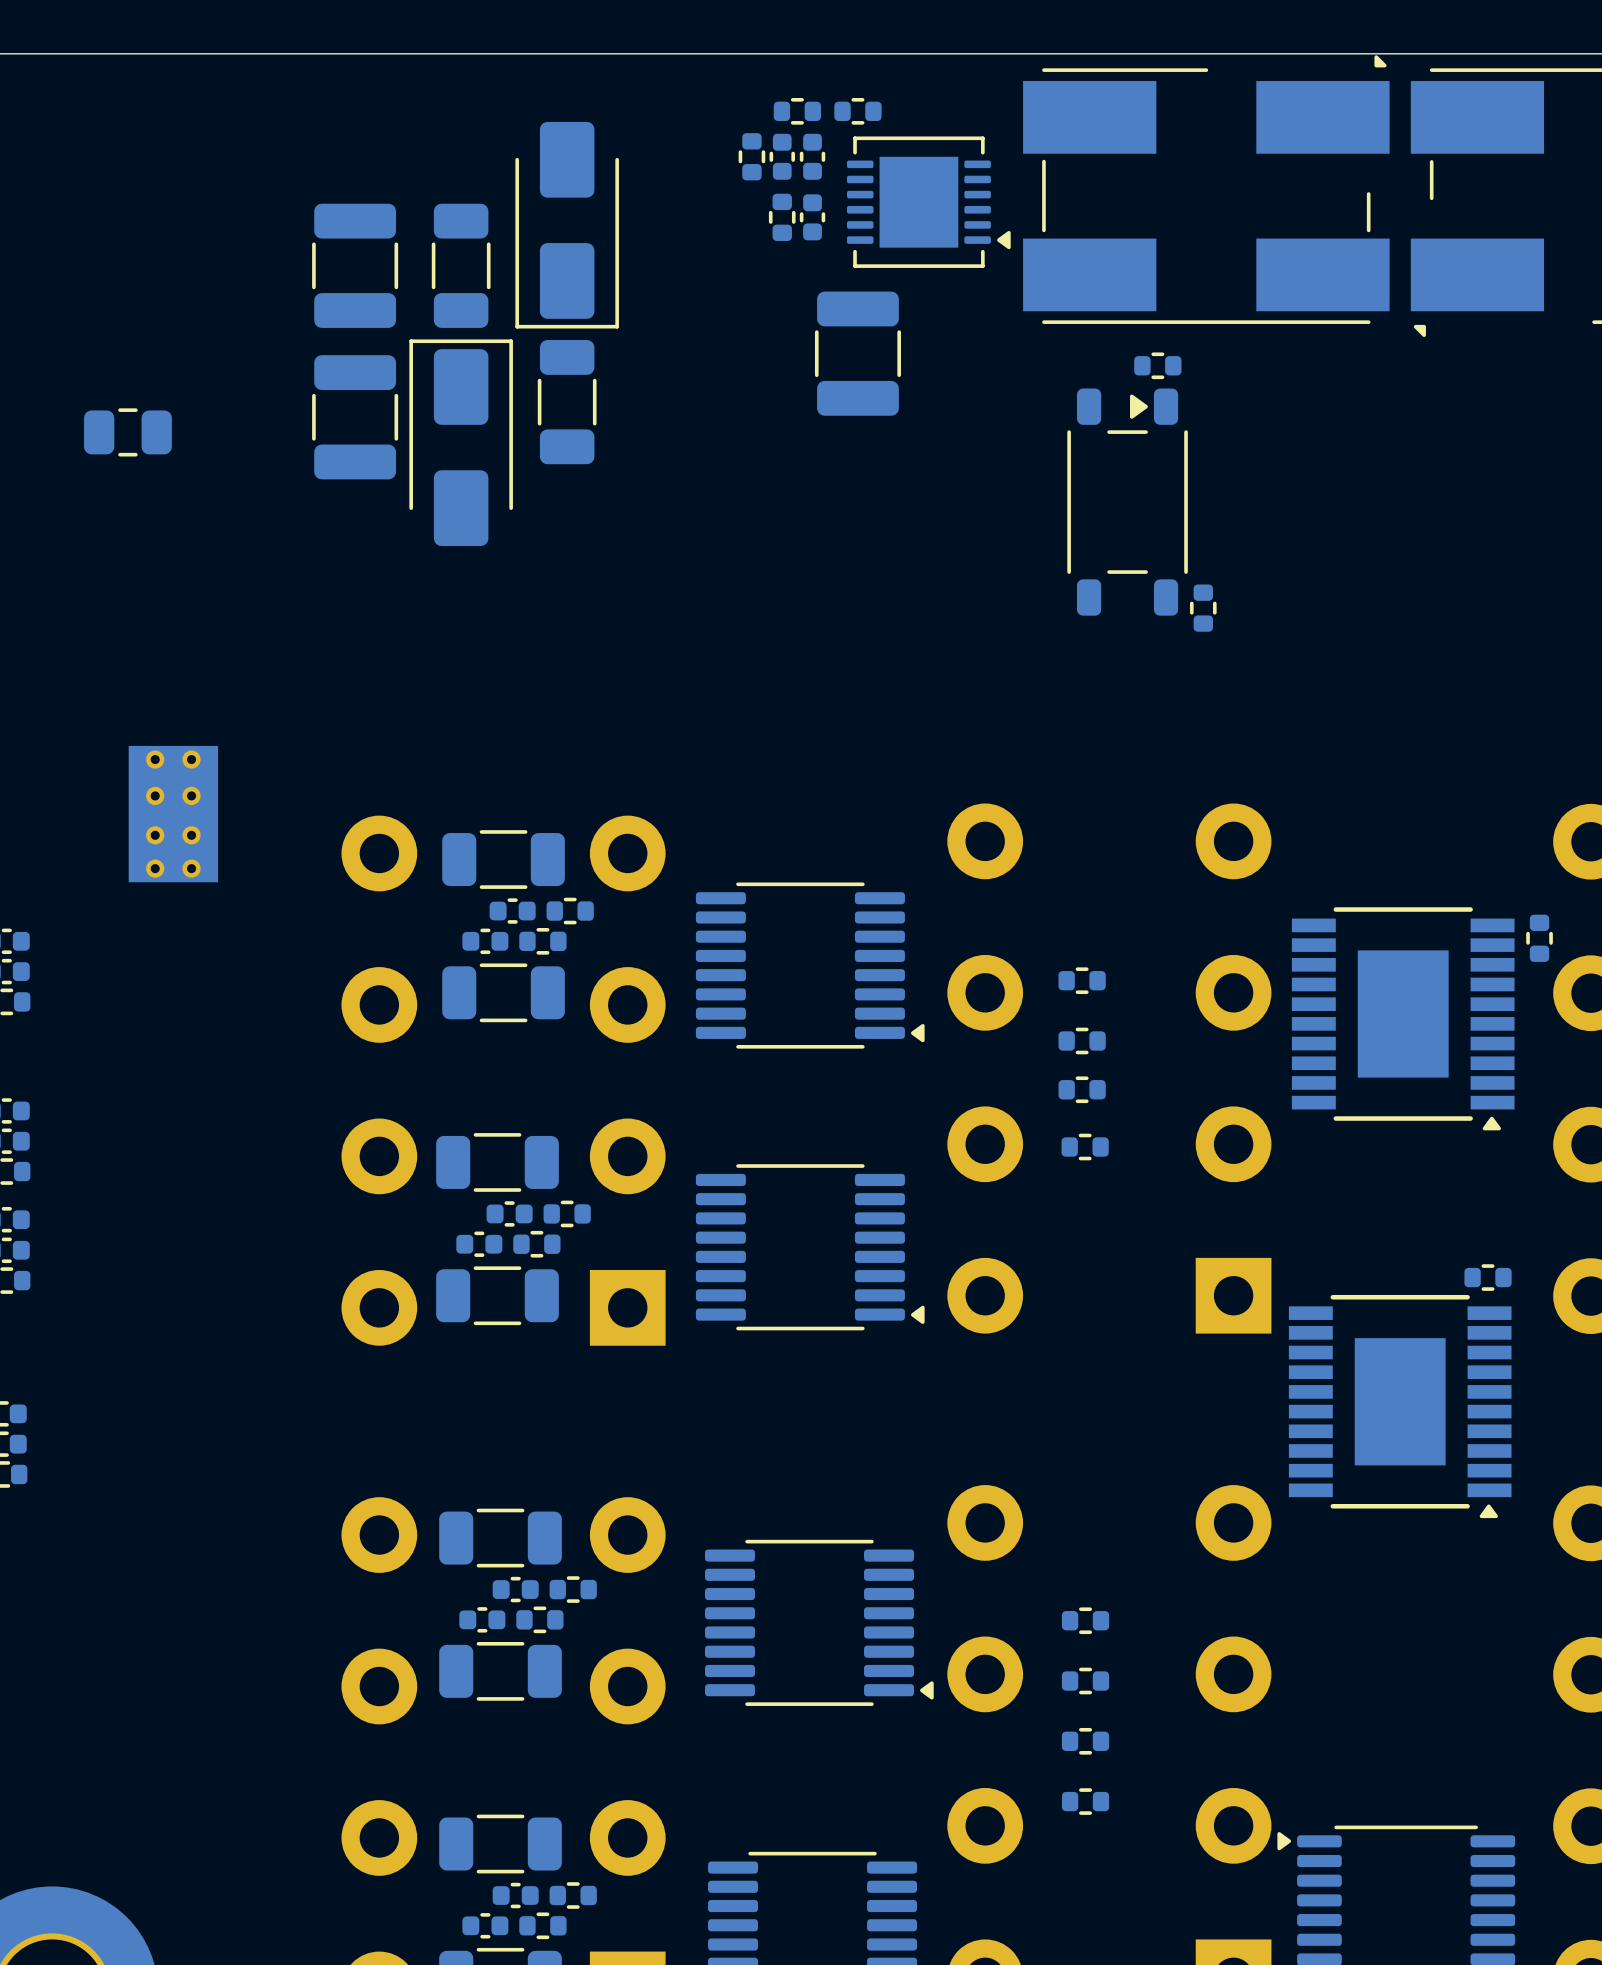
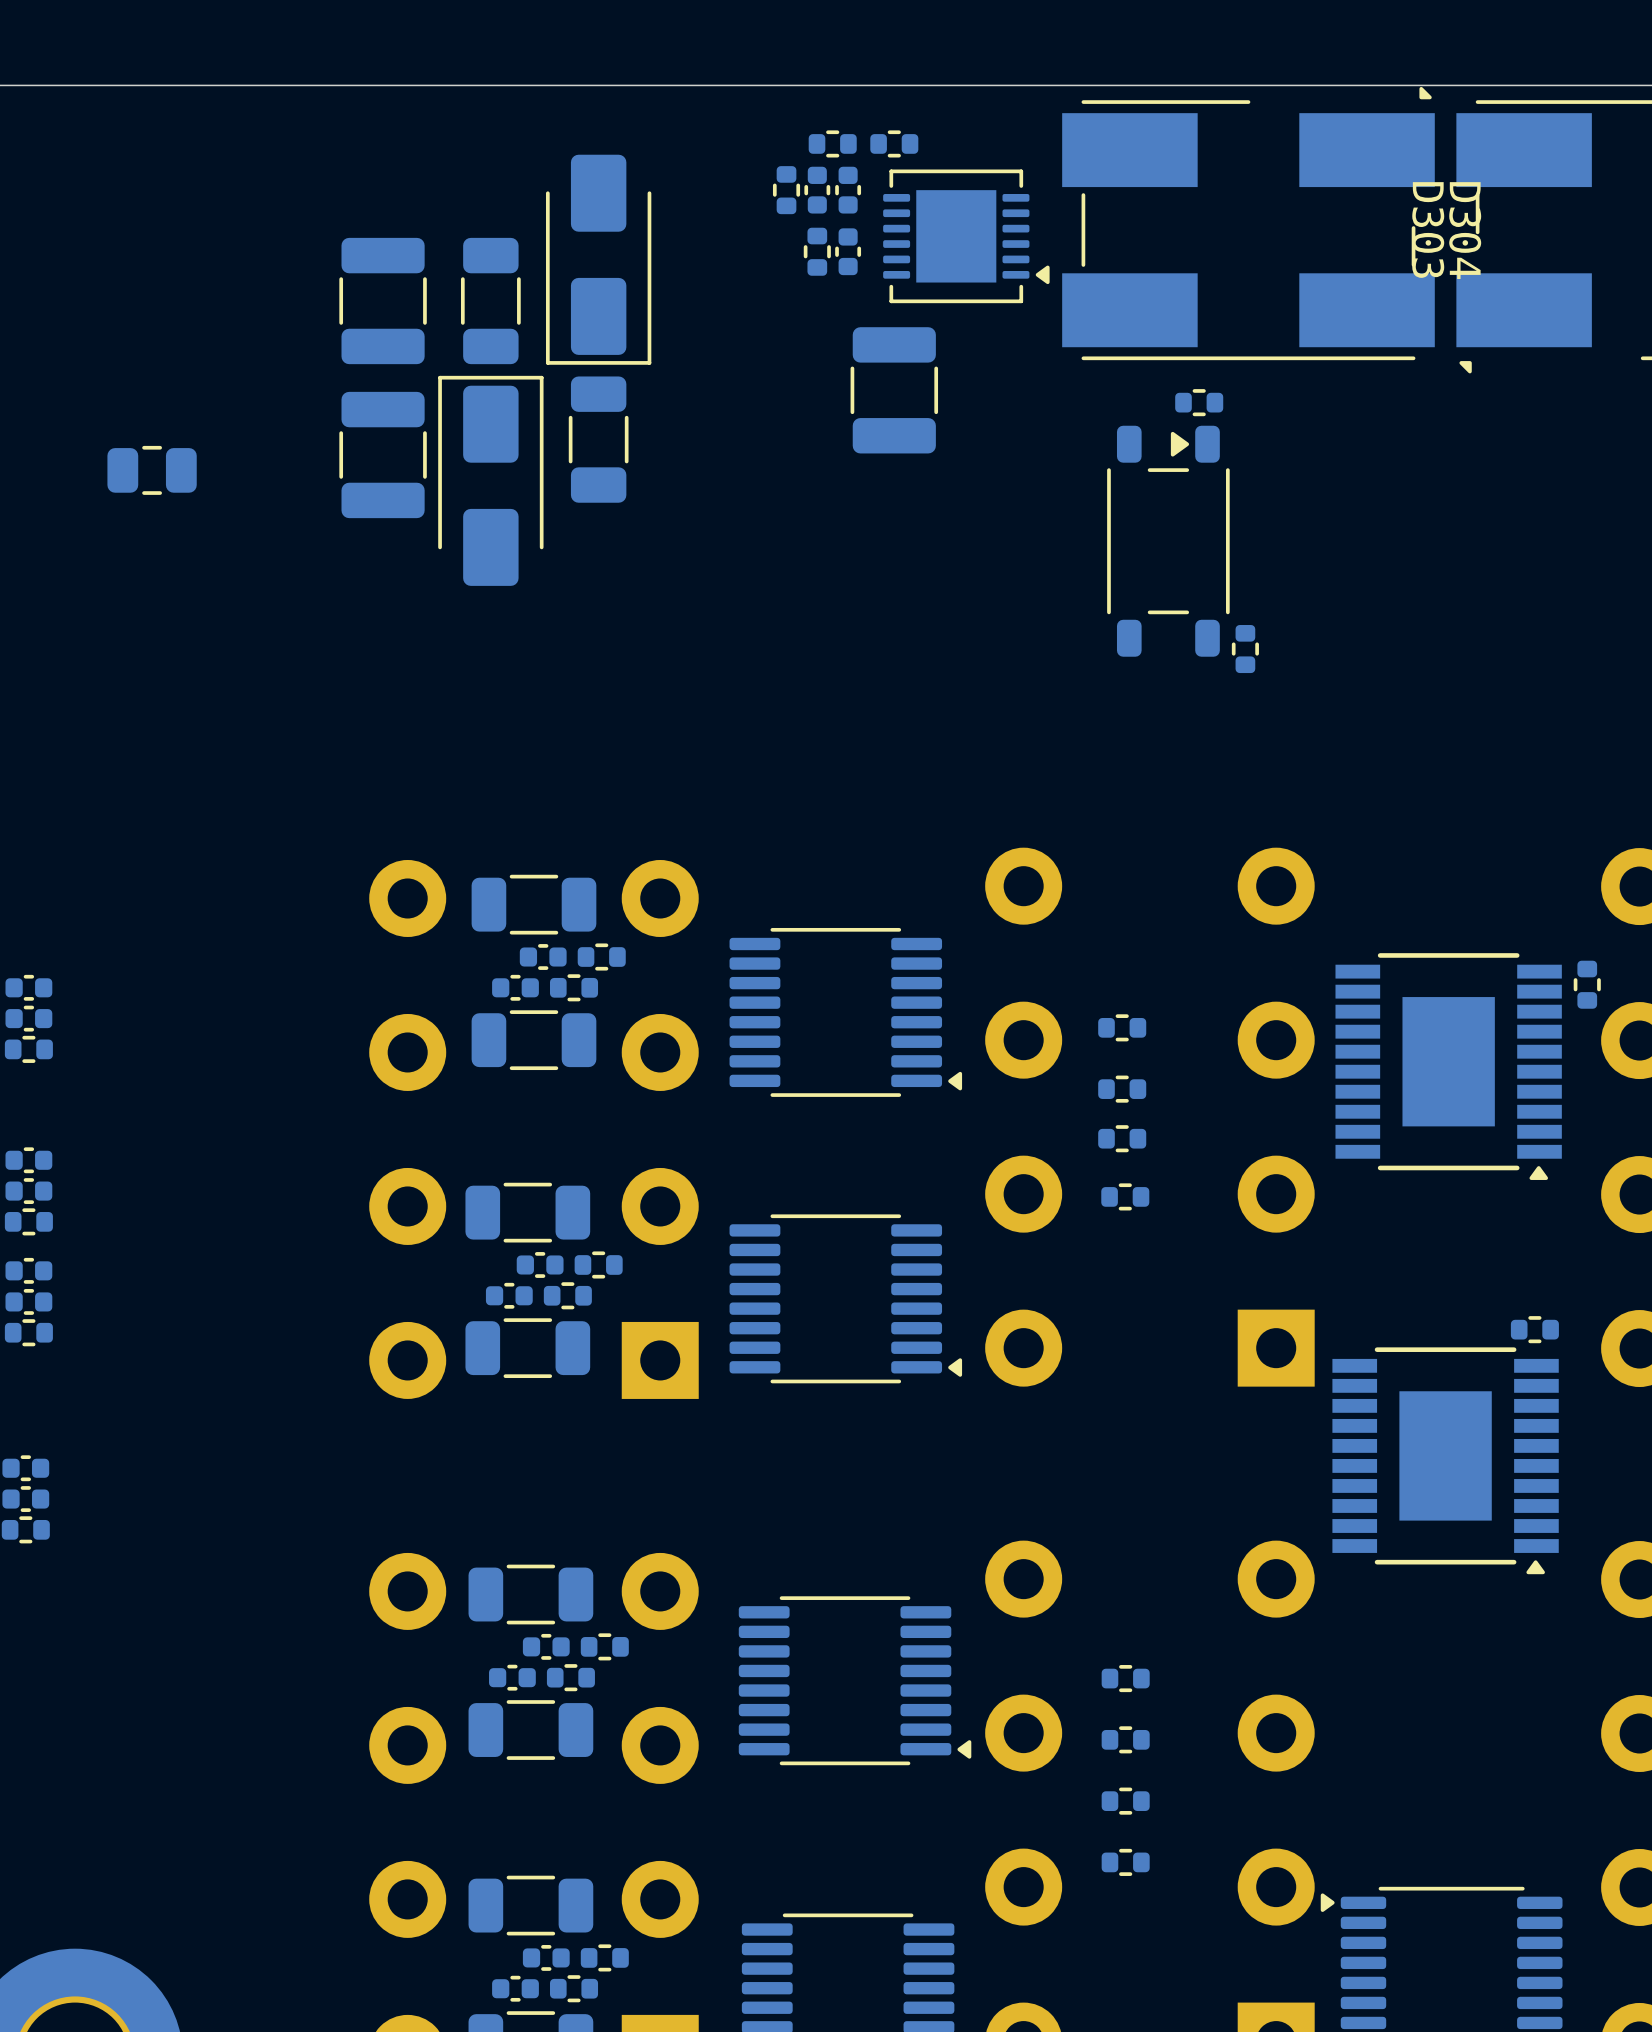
D303 name: none -> D303 (1428, 230)
D304 name: none -> D304 (1465, 230)
part: (173, 814) -> none

